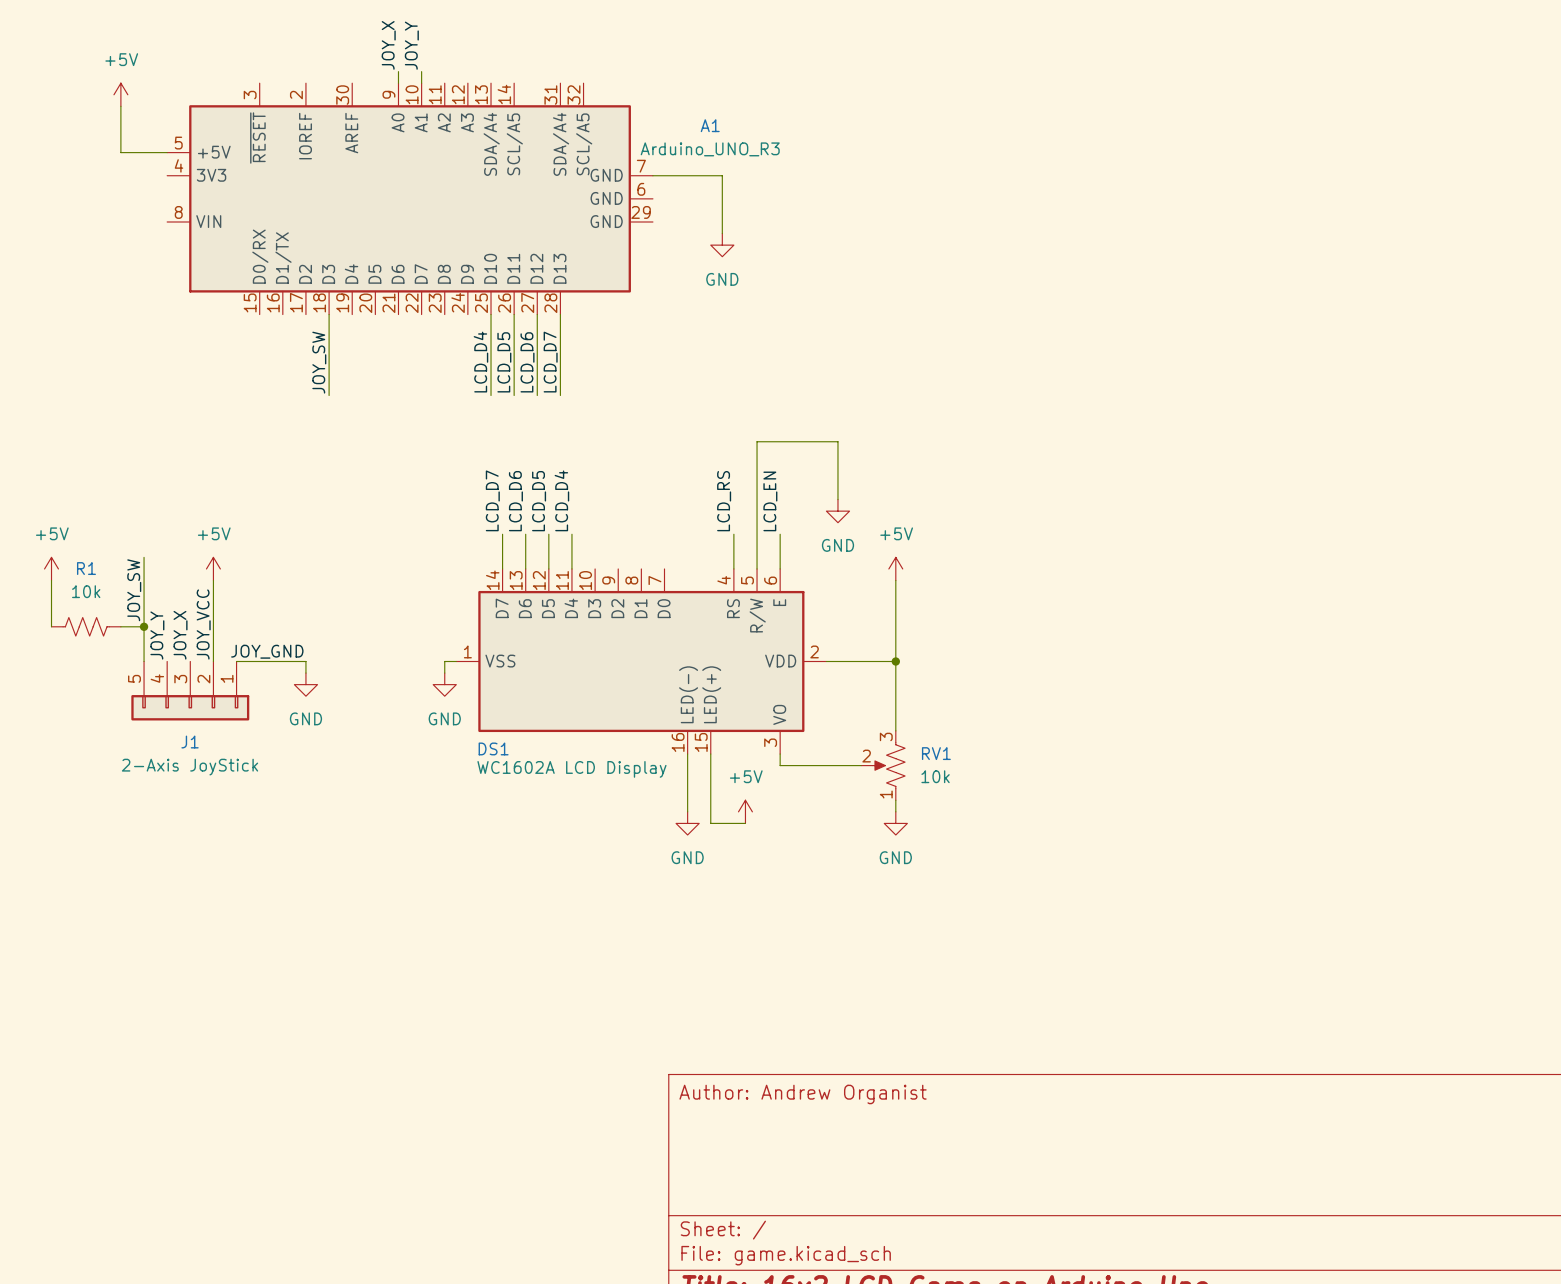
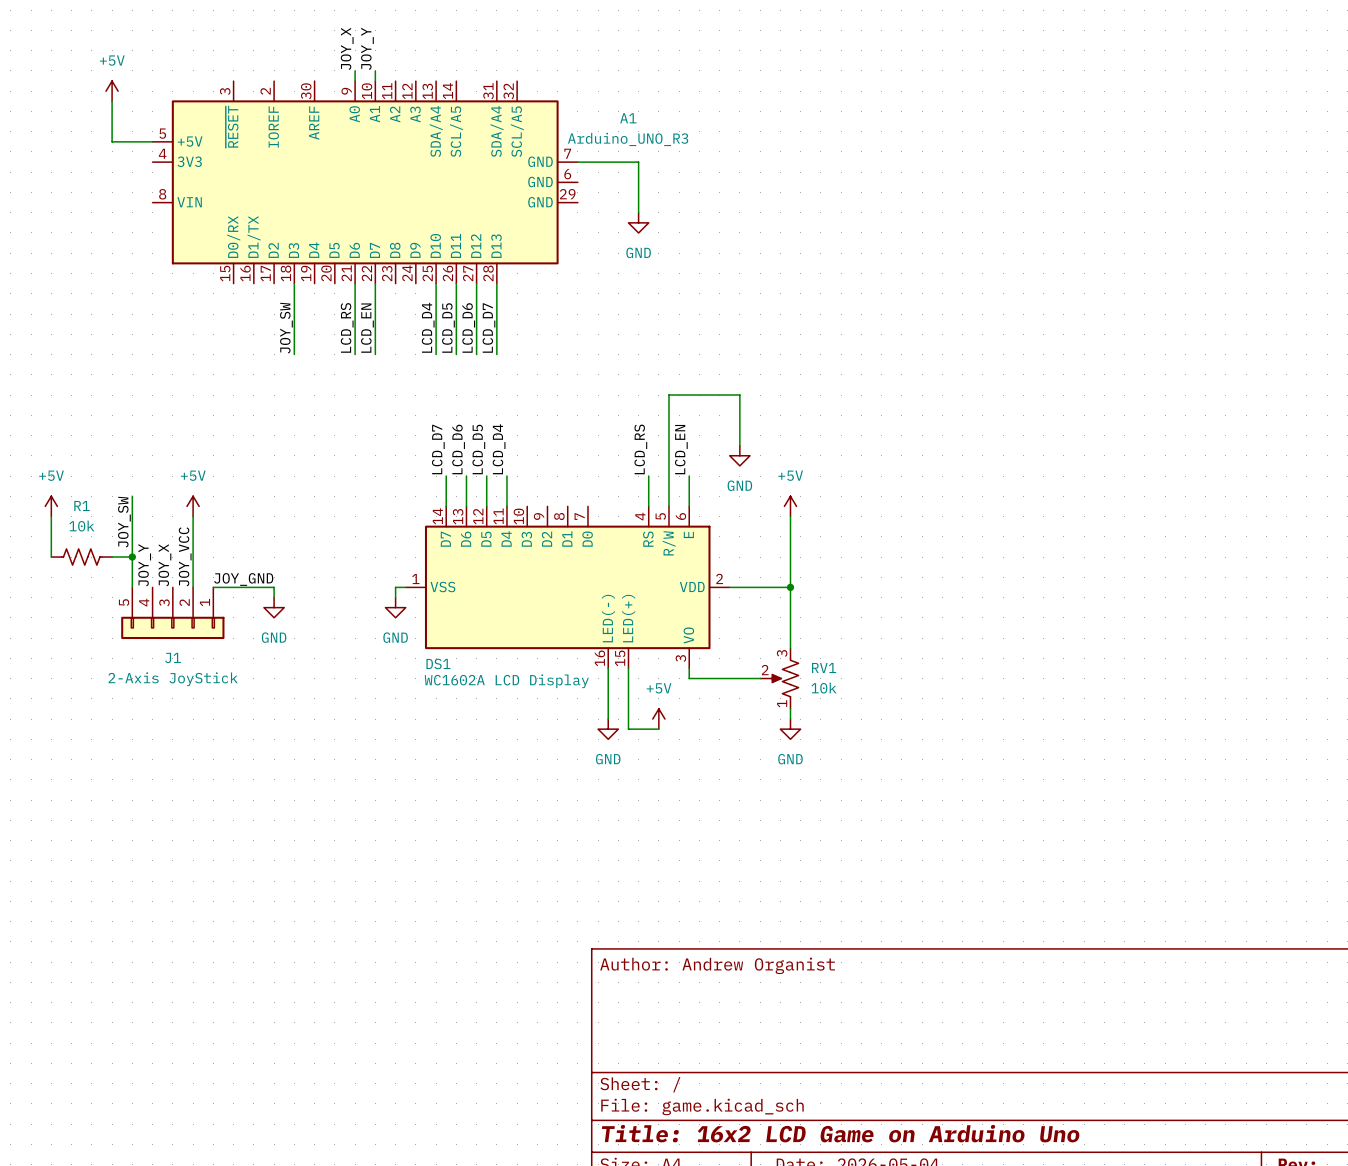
wire: none -> (355, 283) (355, 354)
wire: none -> (375, 283) (375, 354)
label: none -> LCD_RS (347, 327)
label: none -> LCD_EN (367, 328)

